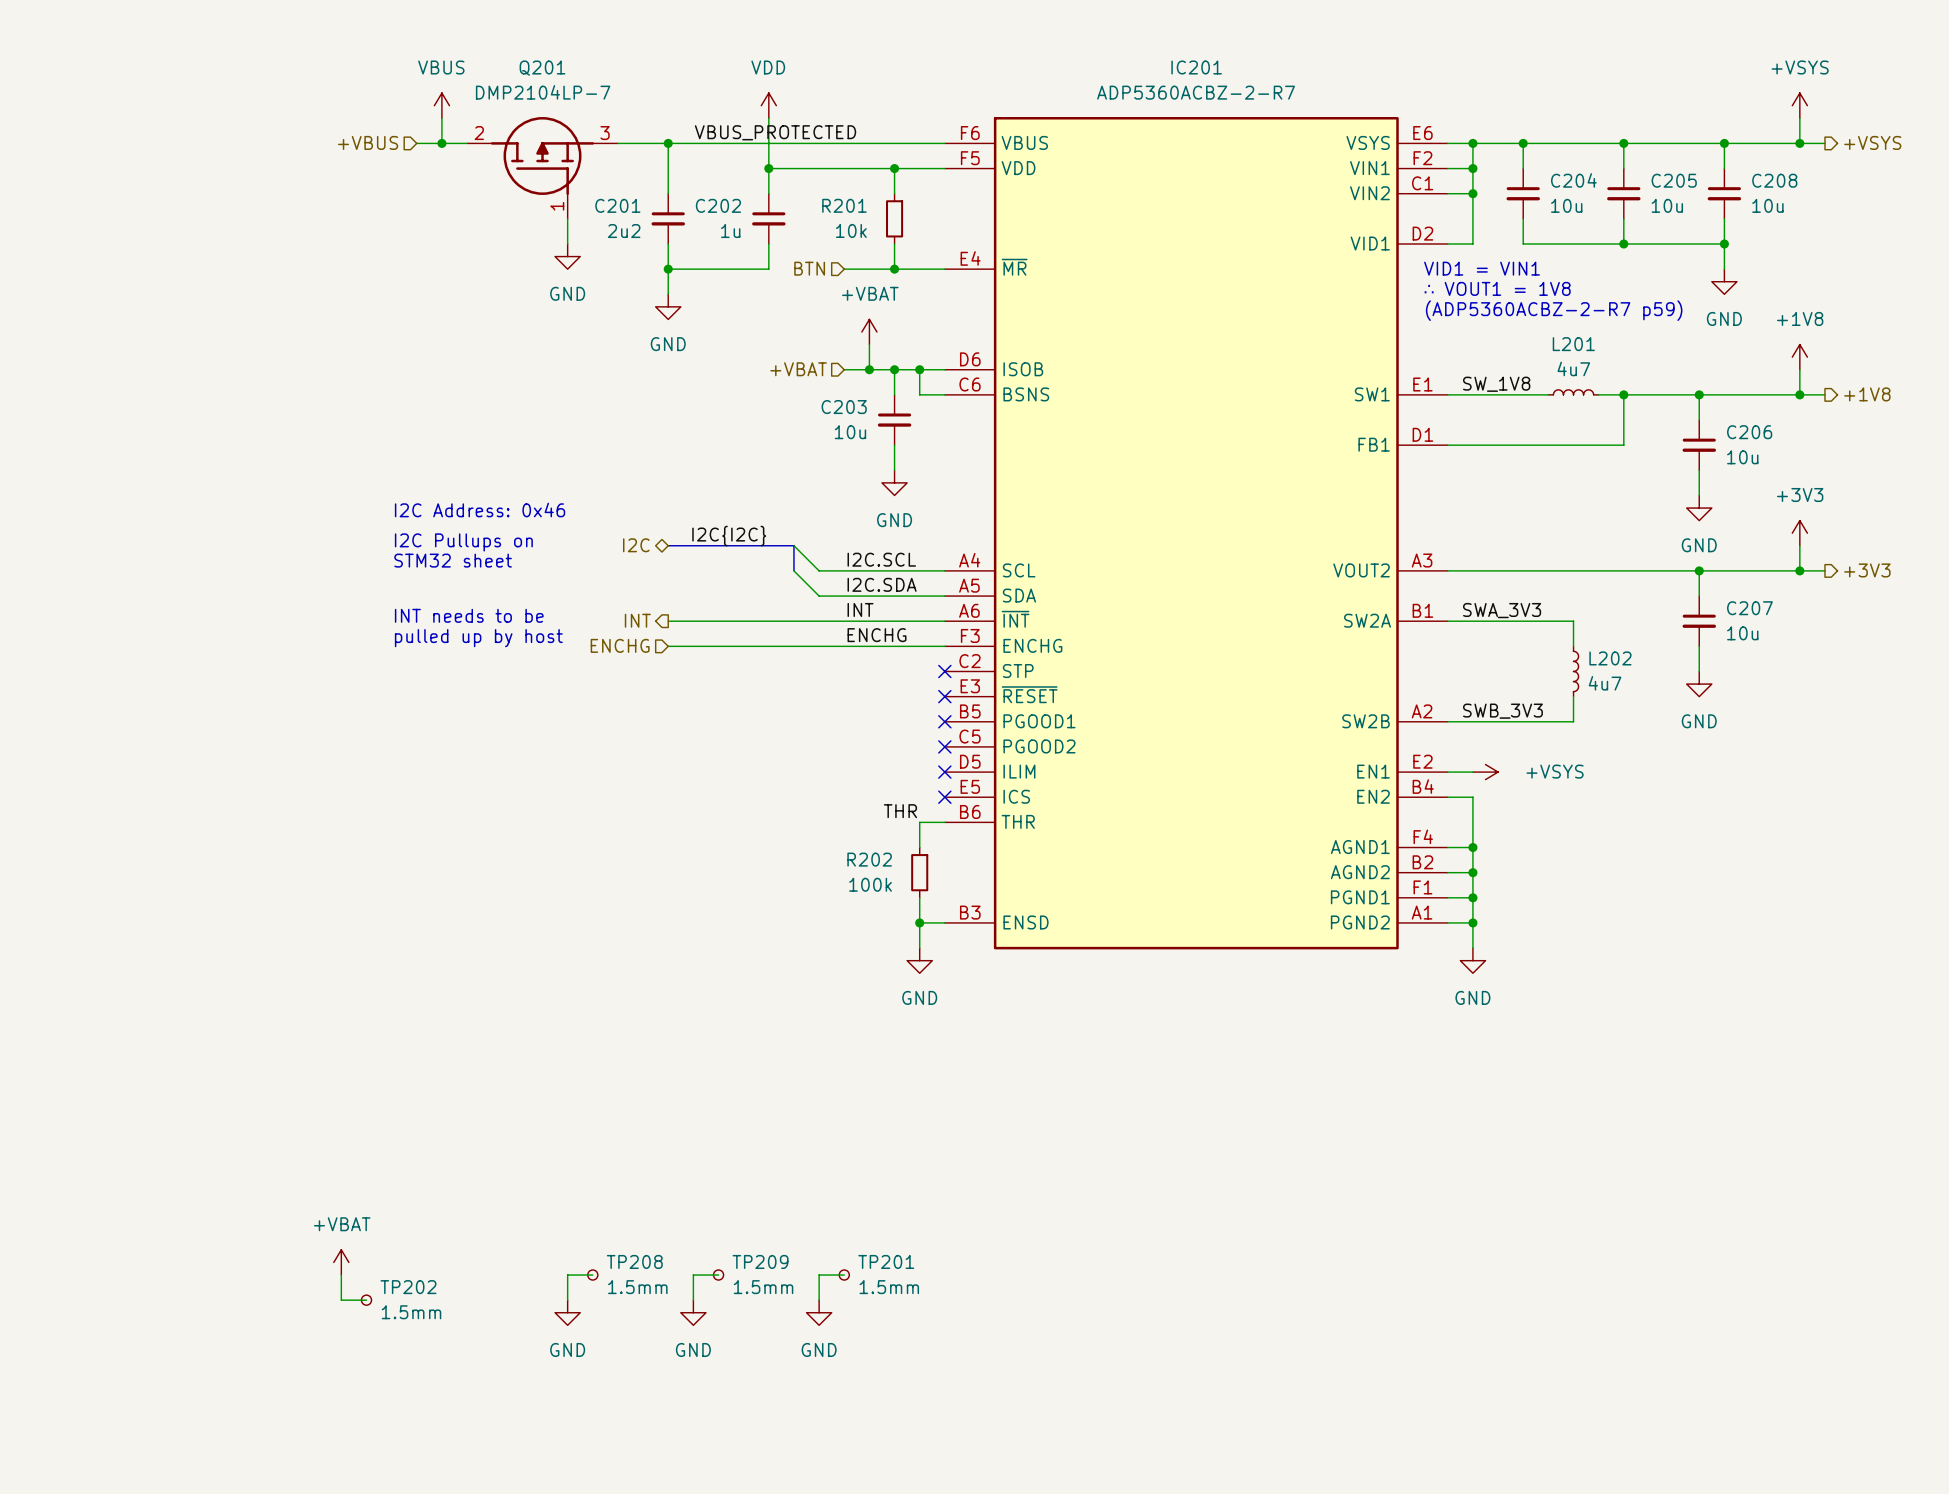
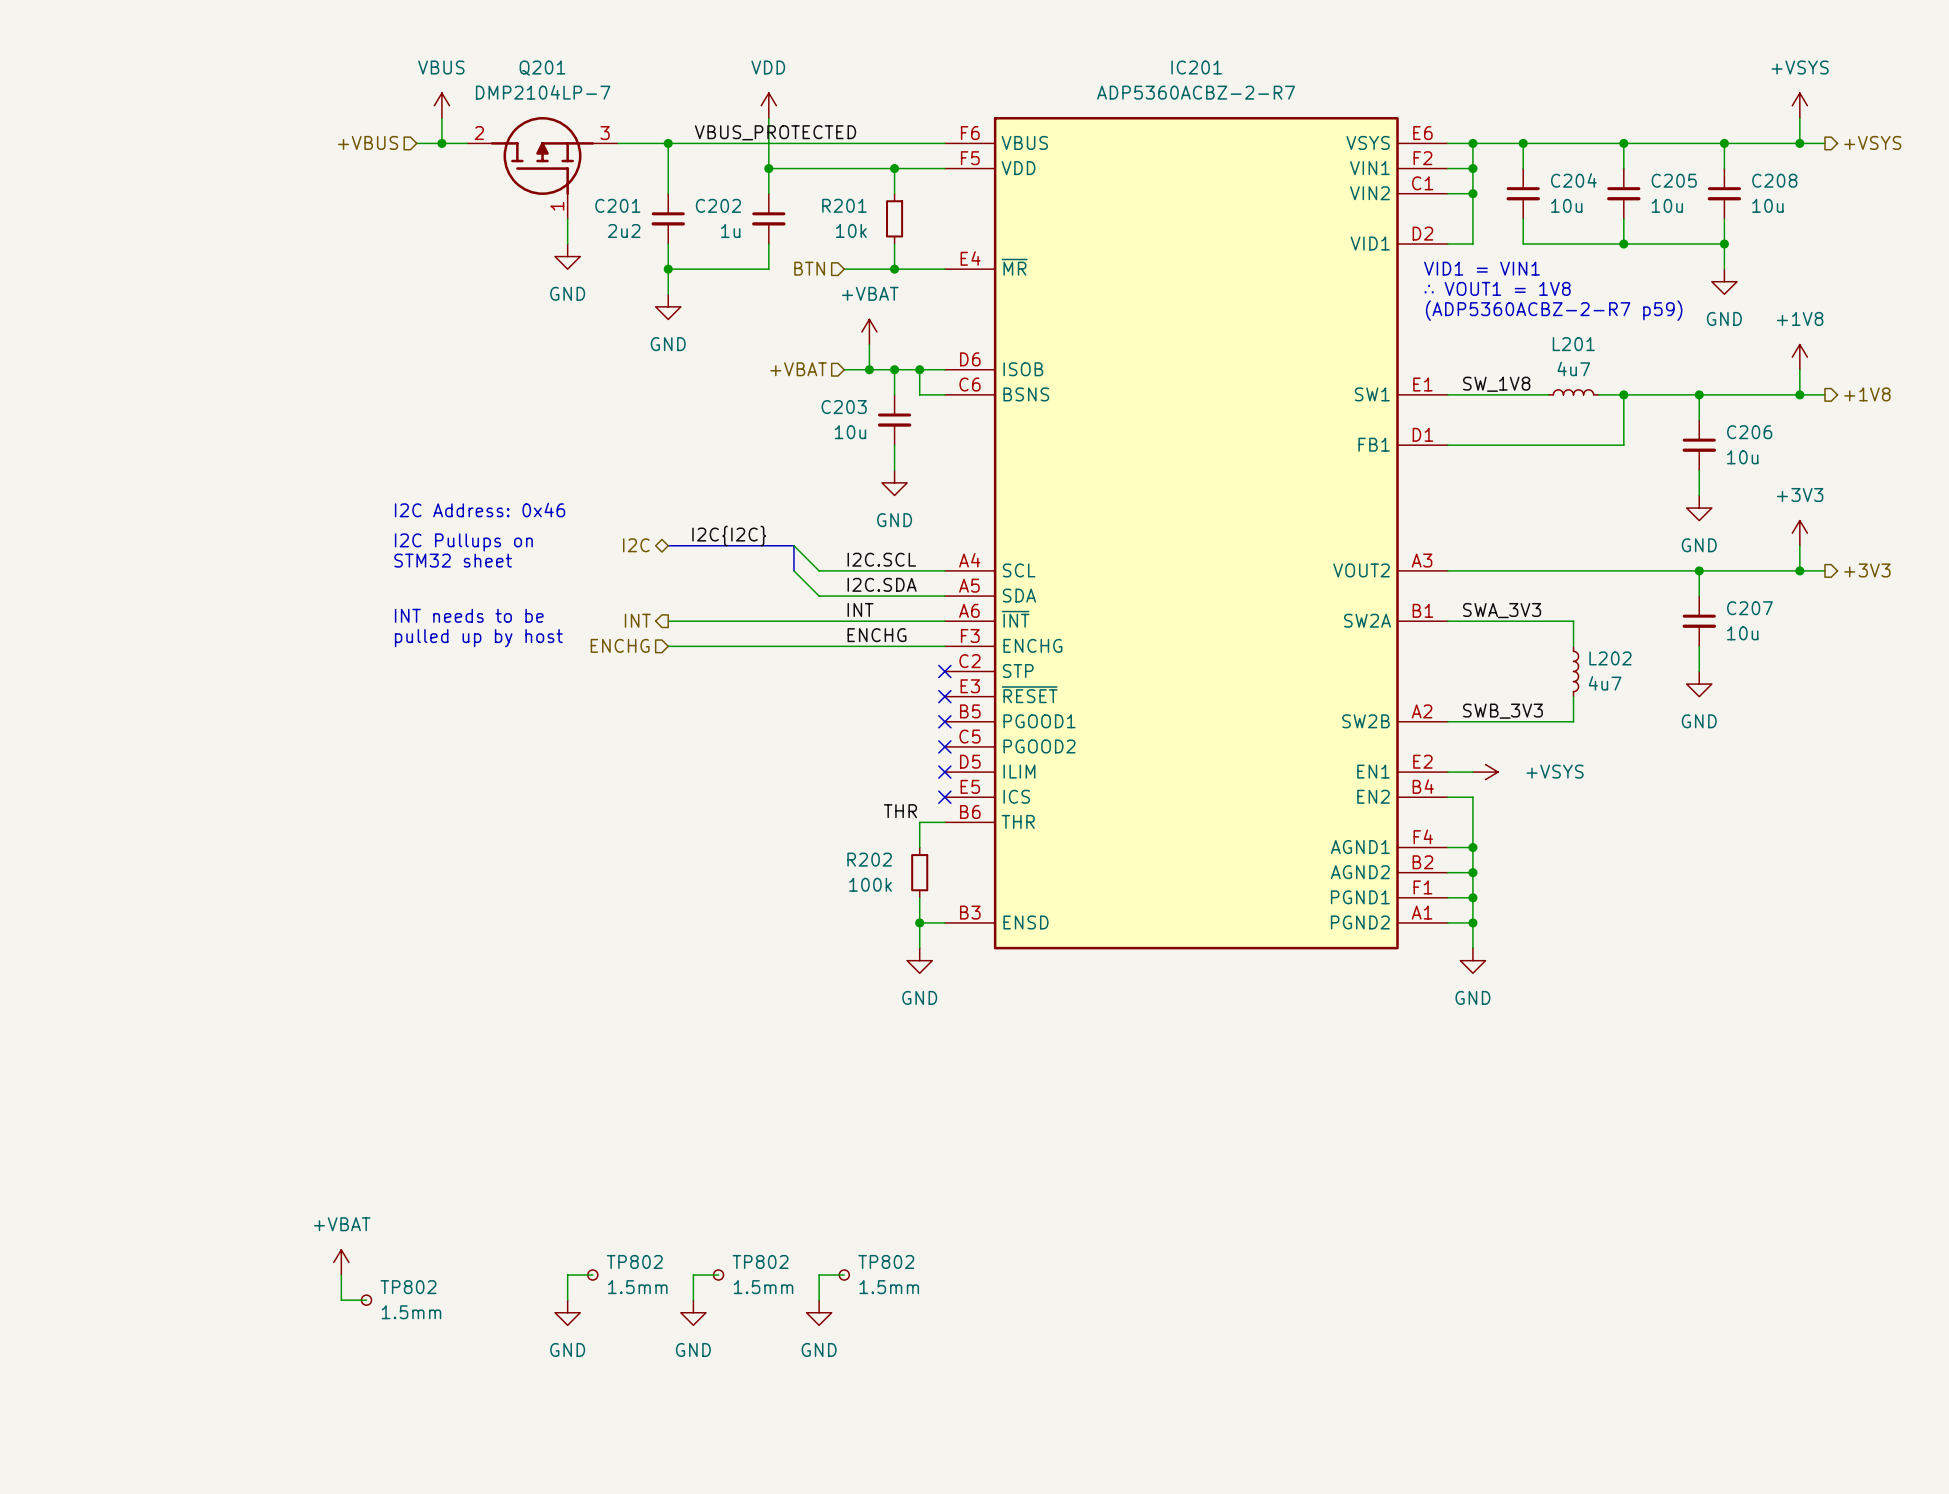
TP208 name: TP208 (634, 1261) -> TP802 (634, 1261)
TP209 name: TP209 (760, 1261) -> TP802 (760, 1261)
TP201 name: TP201 (886, 1261) -> TP802 (886, 1261)
TP202 name: TP202 (408, 1287) -> TP802 (408, 1287)

